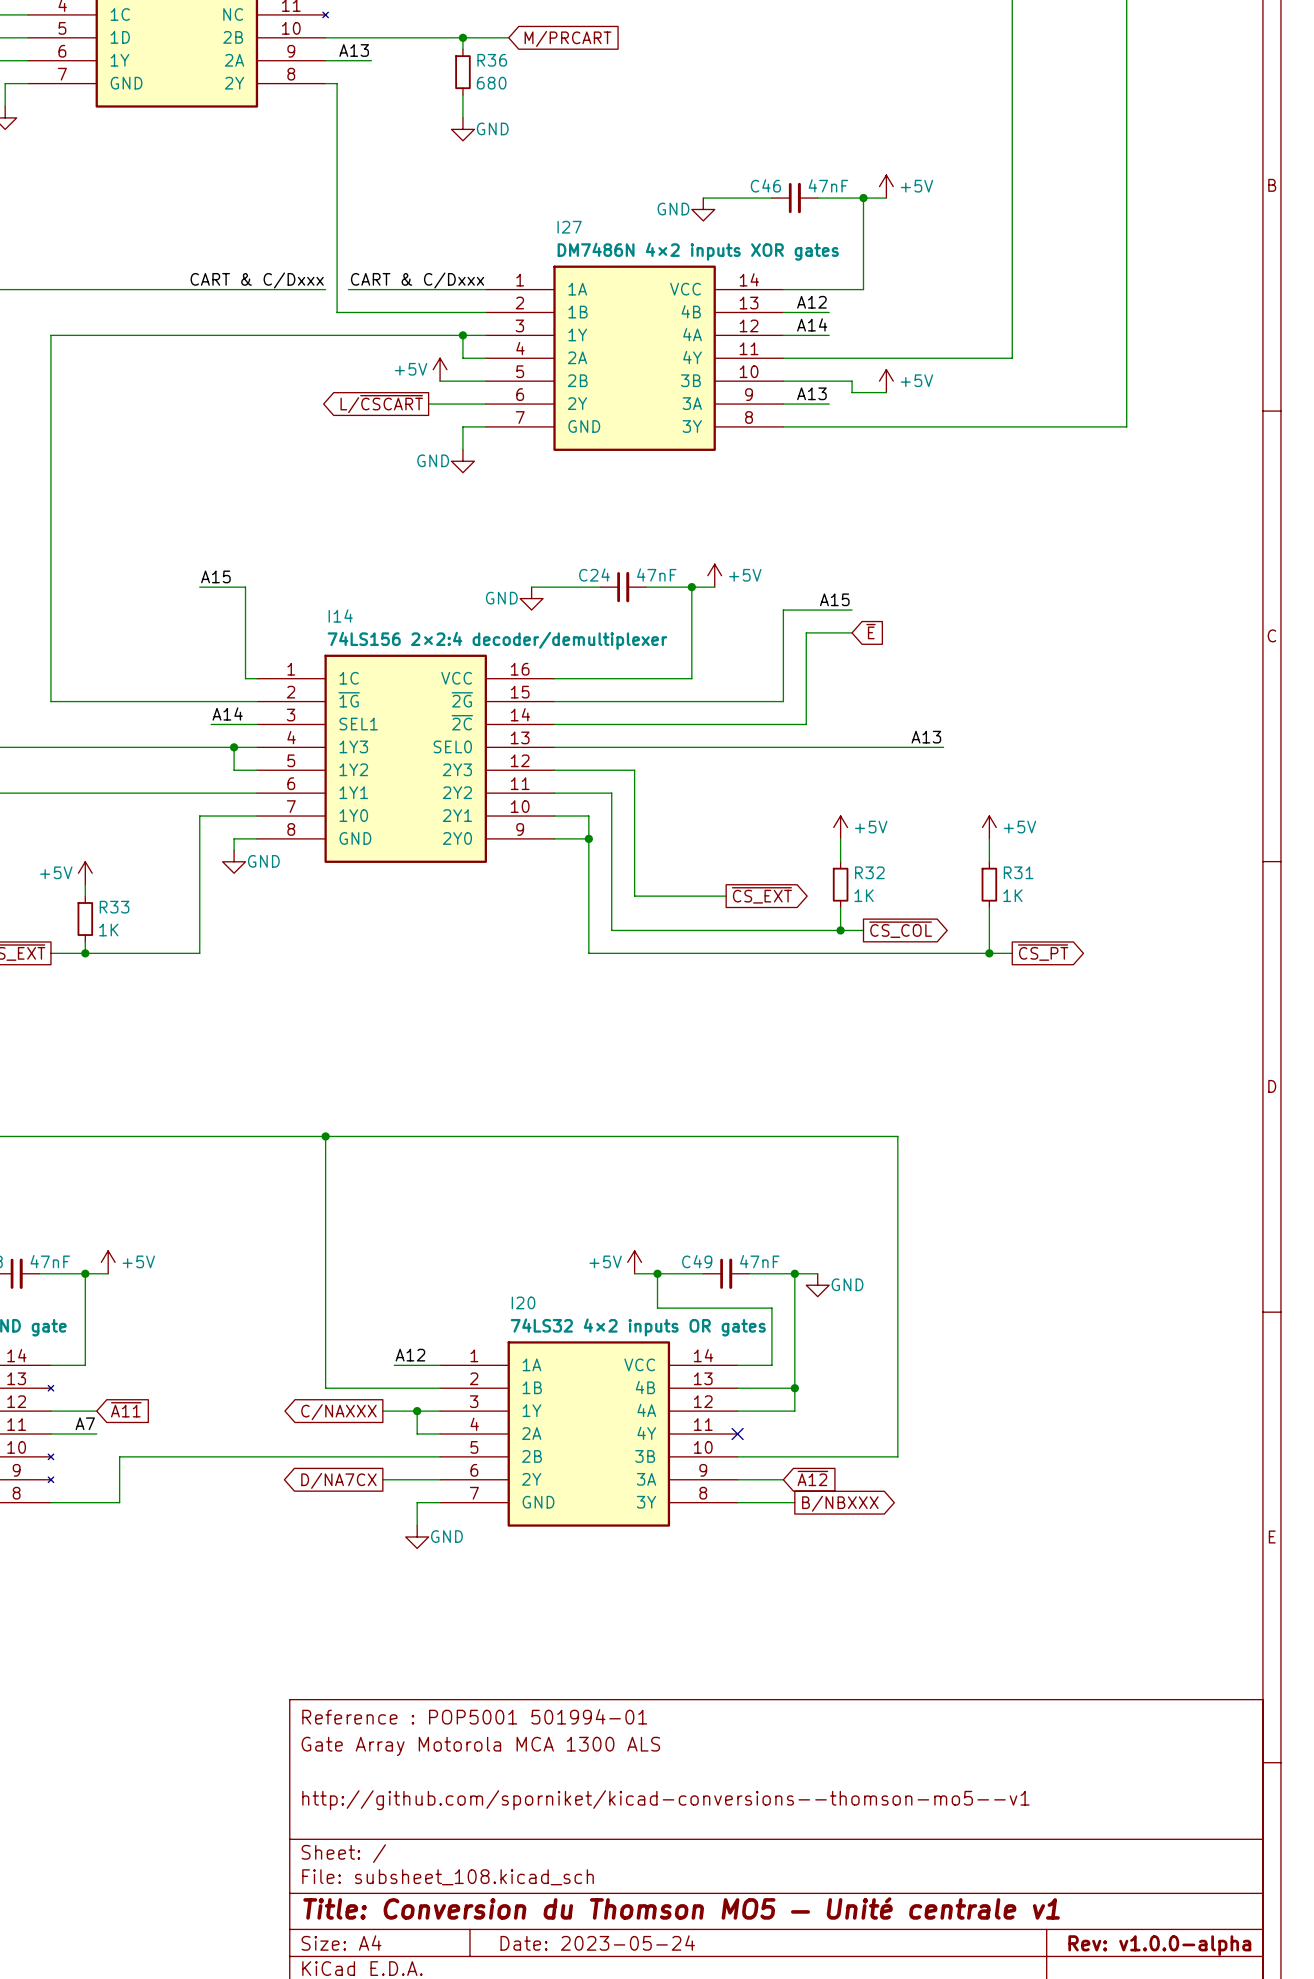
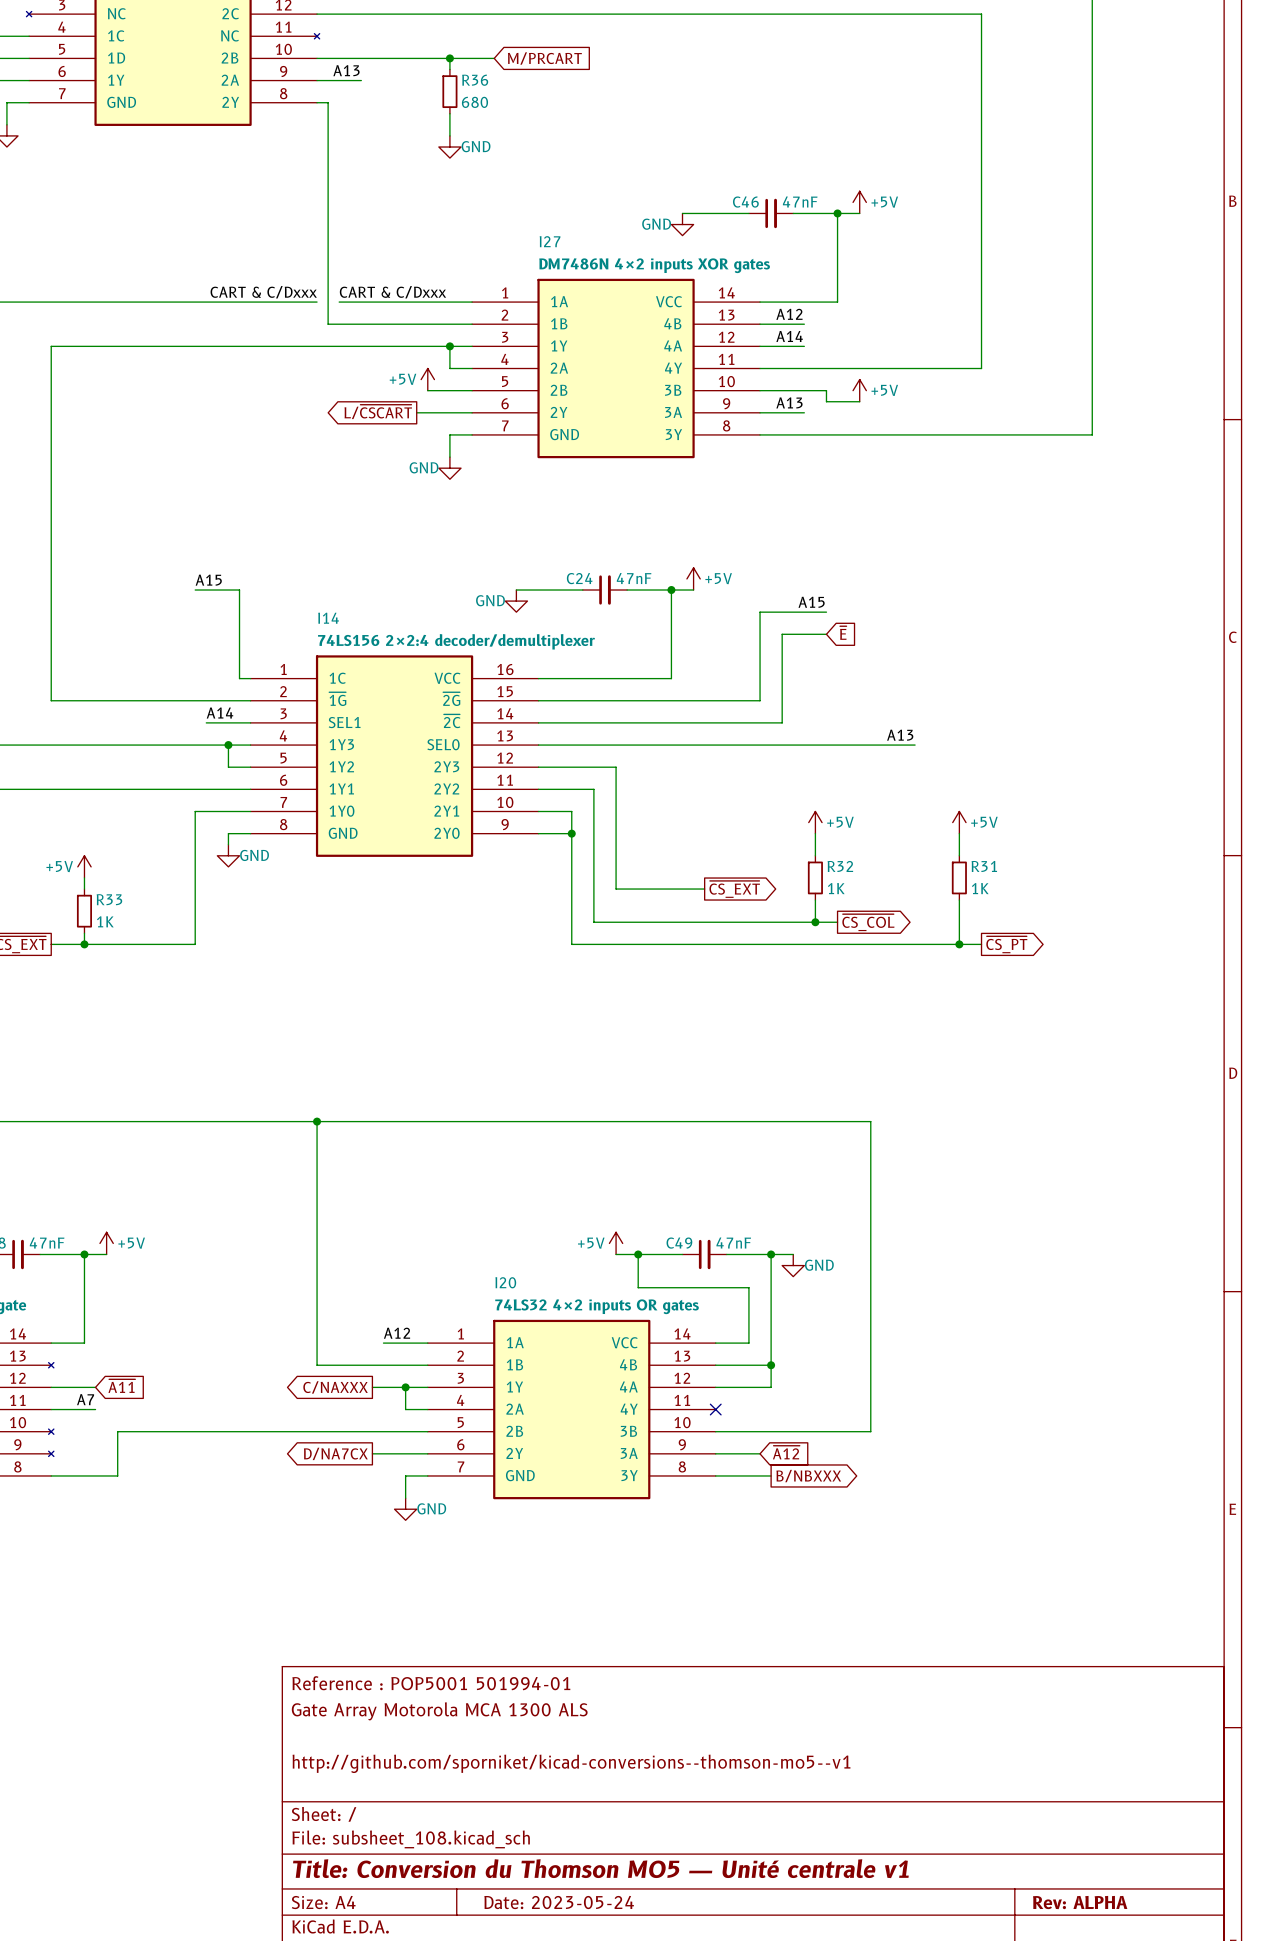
title block: Rev: v1.0.0-alpha (1159, 1945) -> Rev: ALPHA (1080, 1902)

